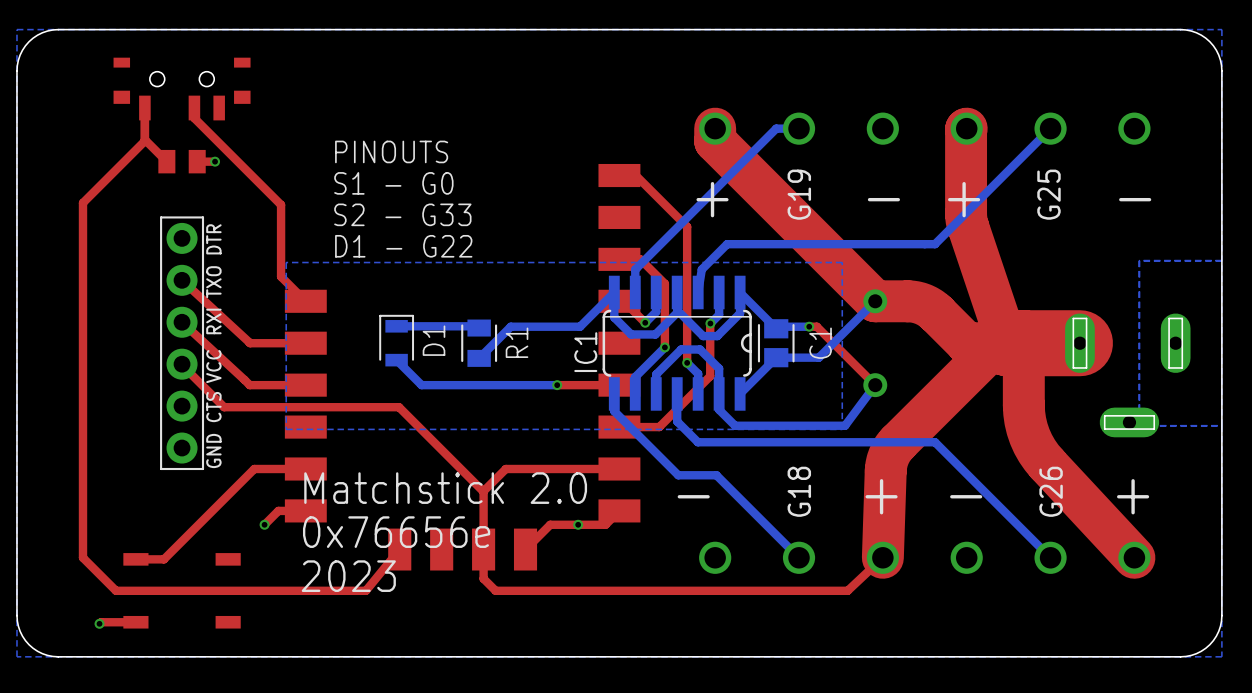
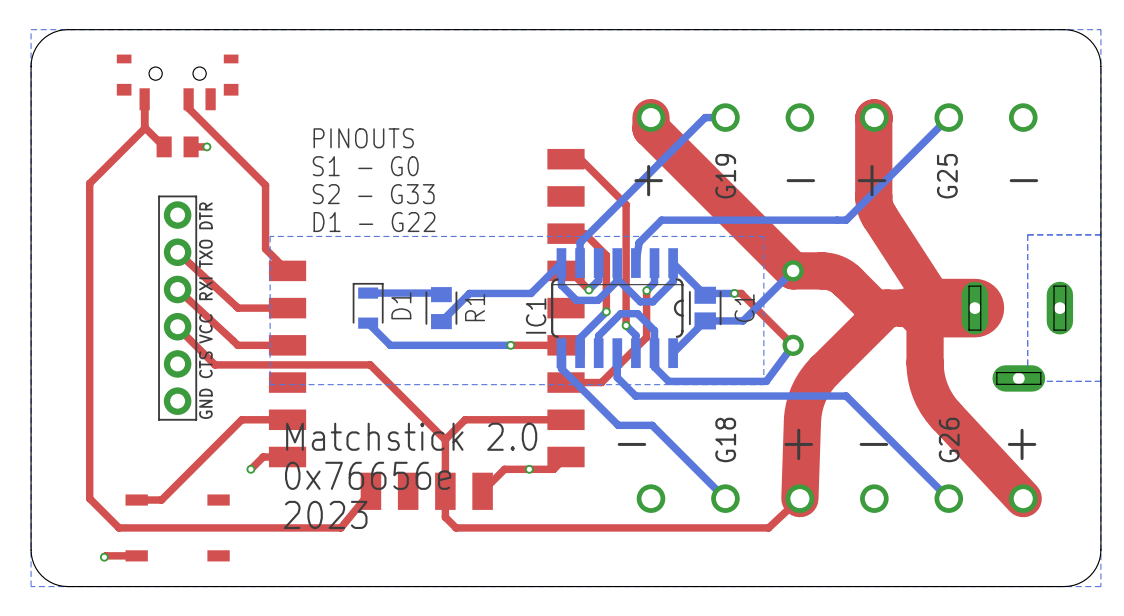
top track: (966, 213) (968, 226) (1007, 343) (1023, 343) -> (873, 193) (877, 213) (938, 308)
top track: (997, 343) (894, 446) (887, 460) (885, 470) -> (887, 308) (815, 381) (806, 400) (802, 421)

